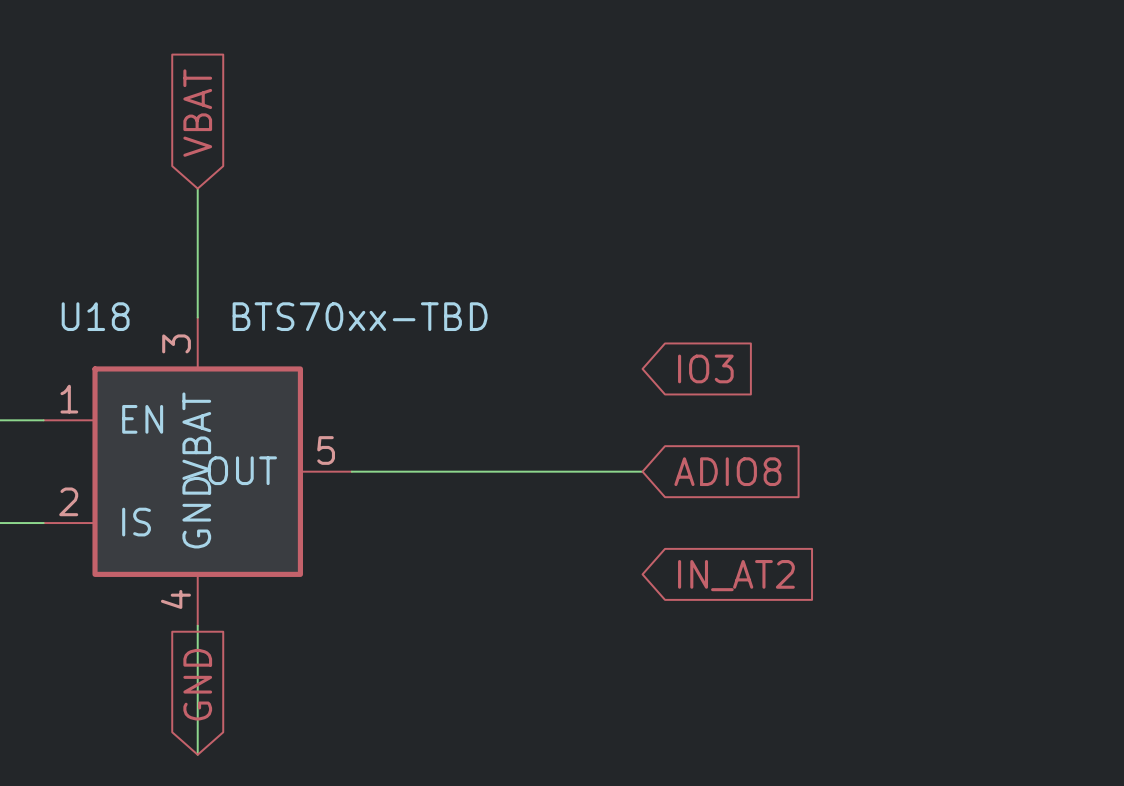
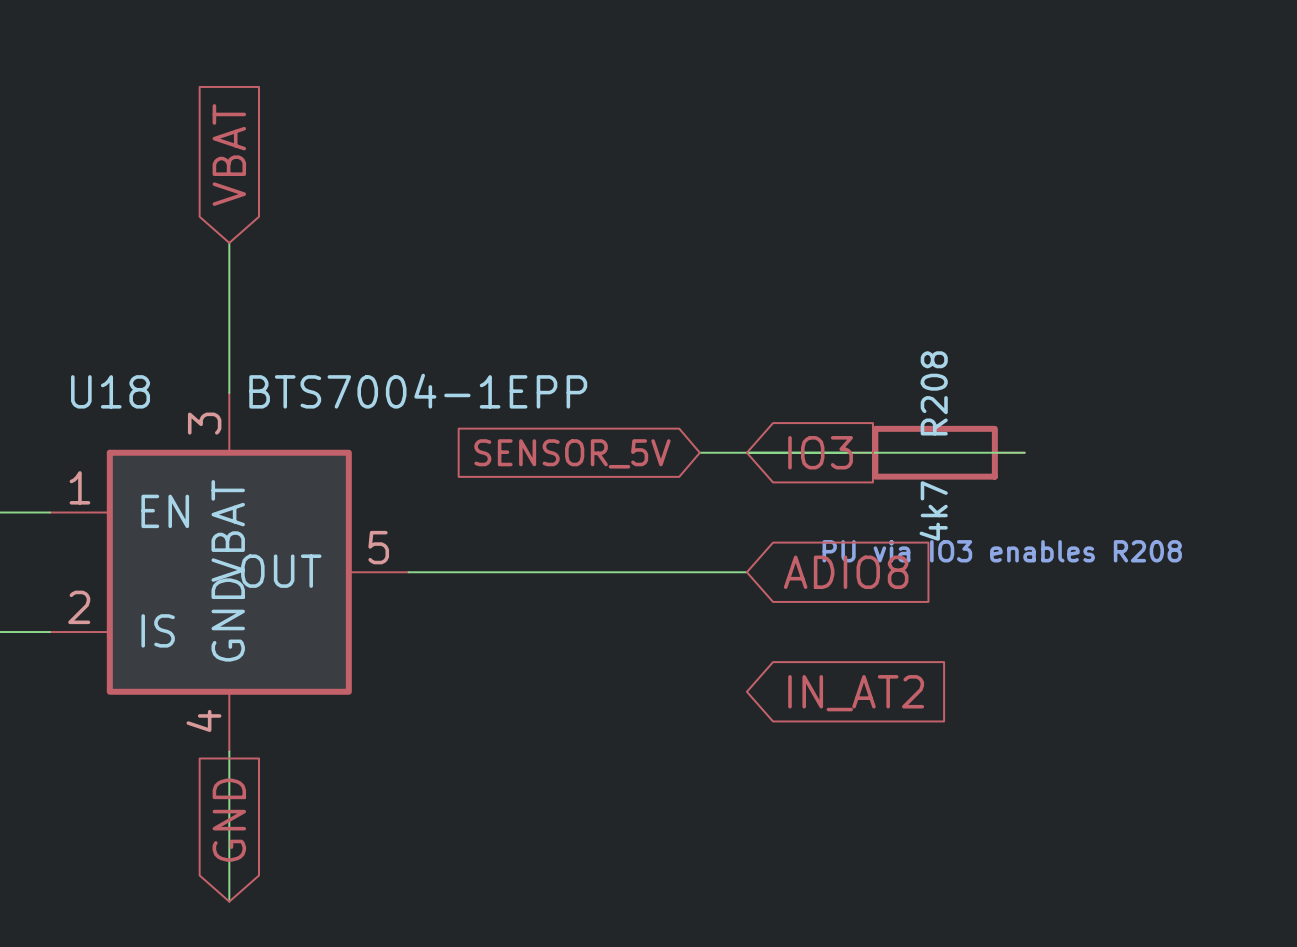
U18 value: BTS70xx-TBD (360, 316) -> BTS7004-1EPP (418, 391)
wire: none -> (699, 452) (1024, 452)
R208: none -> 4k7 (935, 452)
global label: none -> SENSOR_5V (572, 453)
text: none -> PU via IO3 enables R208 (1002, 551)

